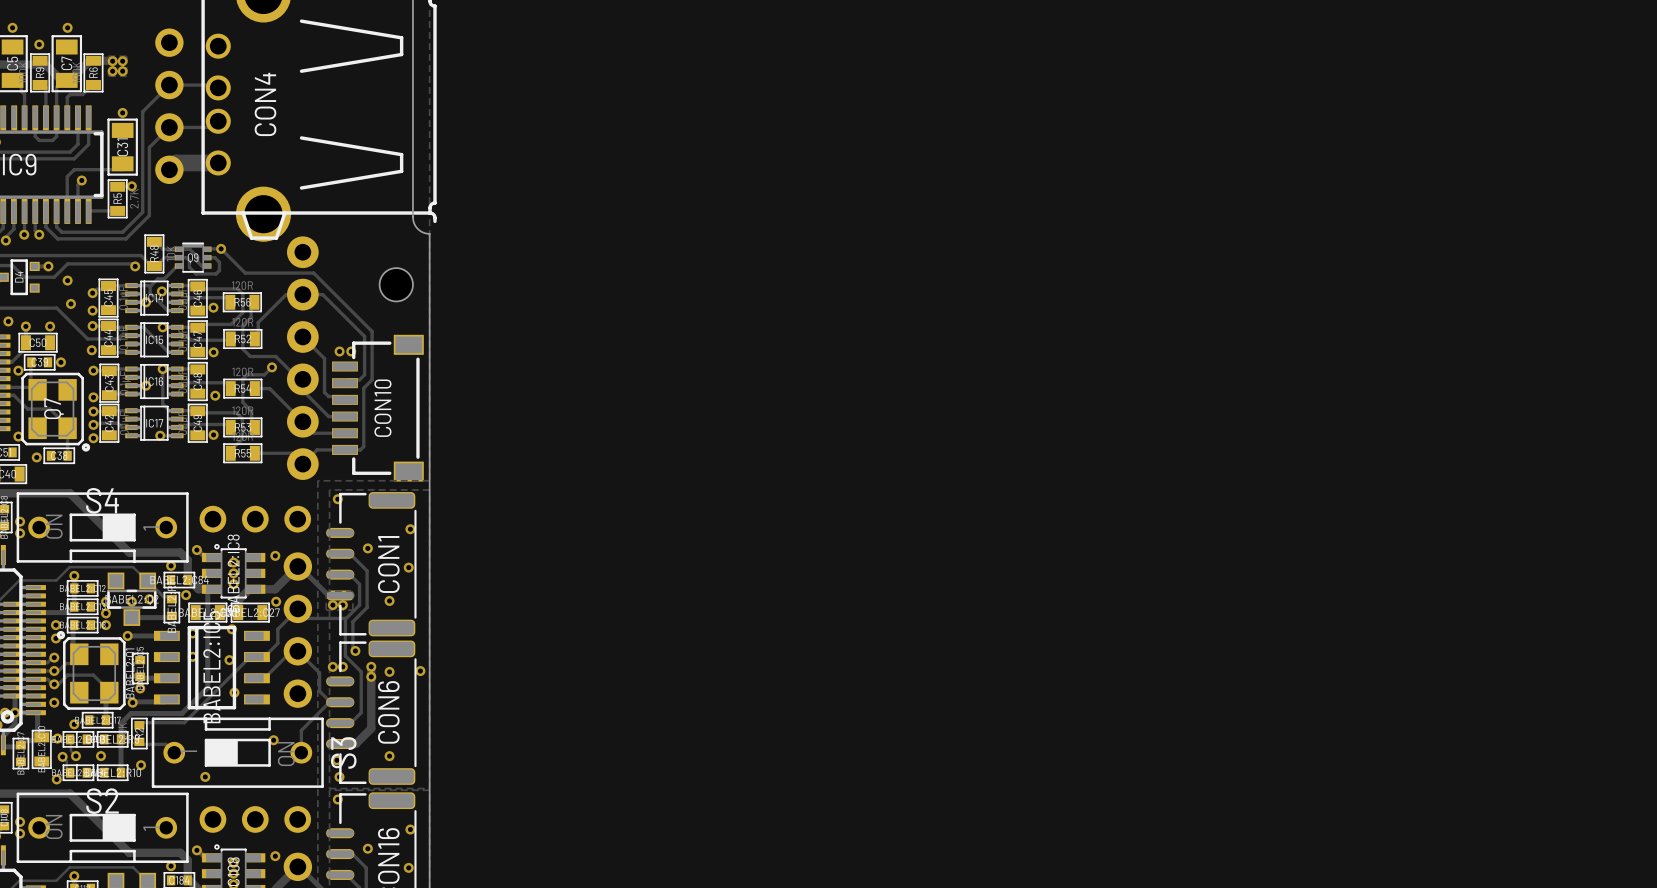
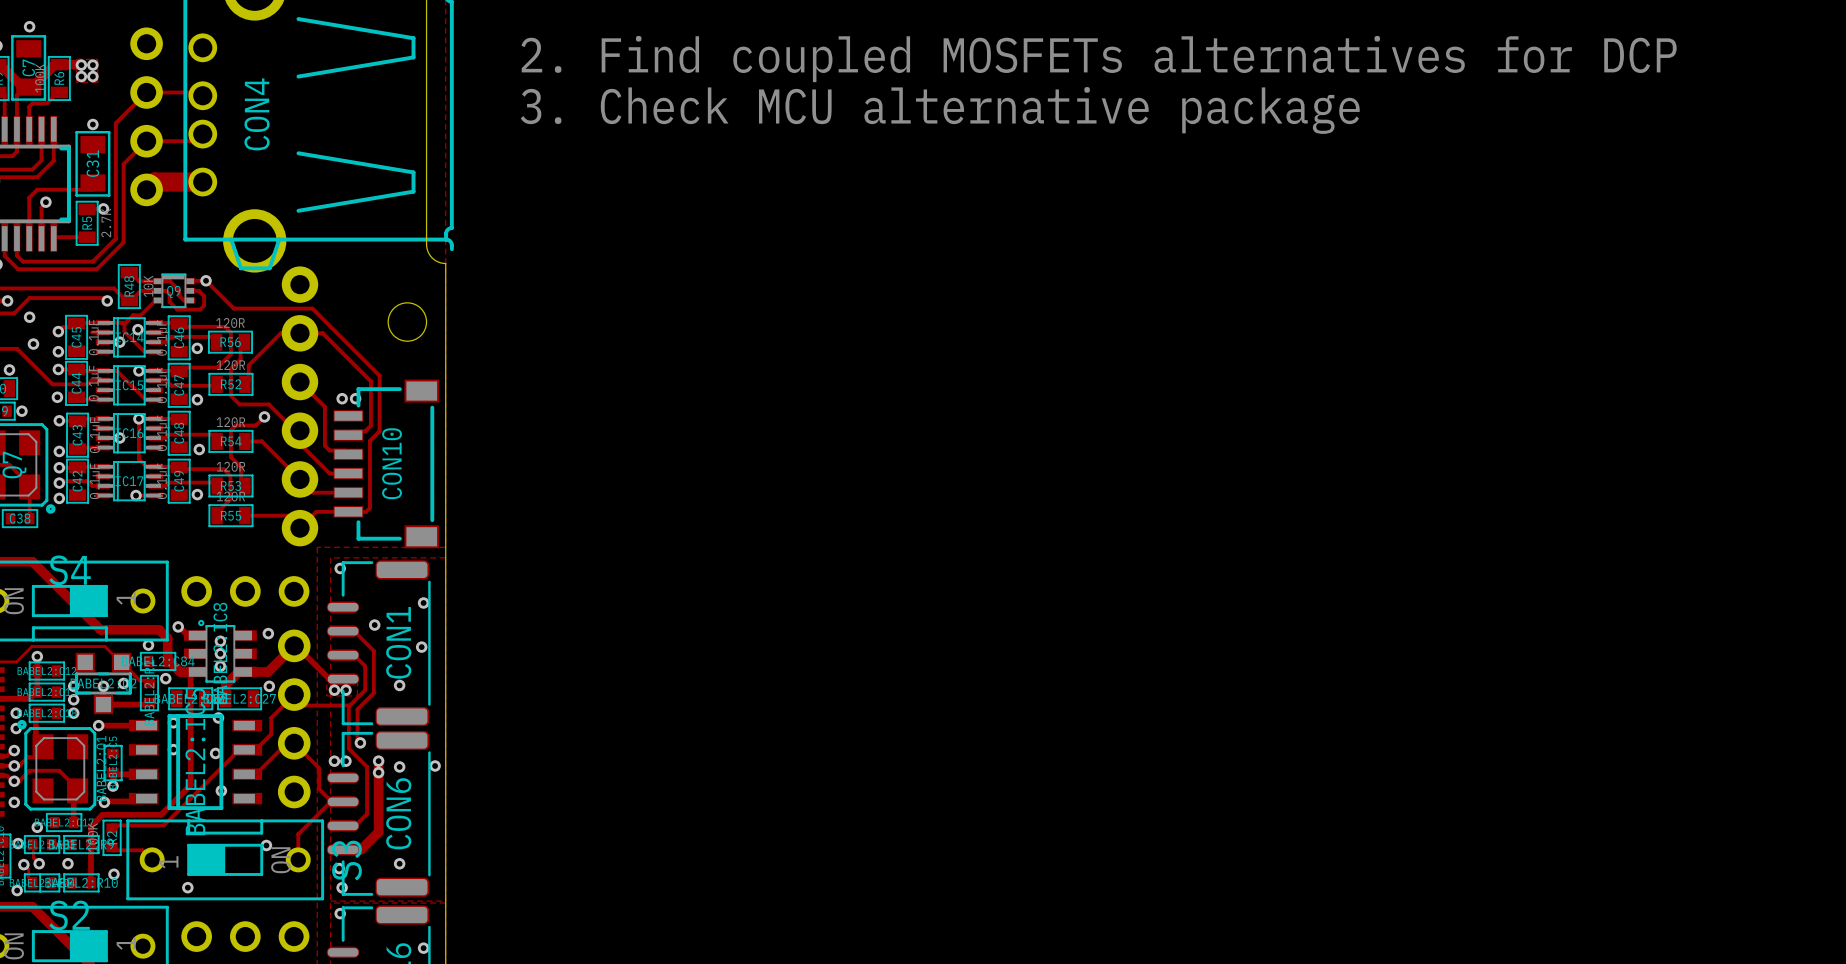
text: none -> 2. Find coupled MOSFETs alternatives for DCP (1099, 59)
text: none -> 3. Check MCU alternative package (940, 110)

